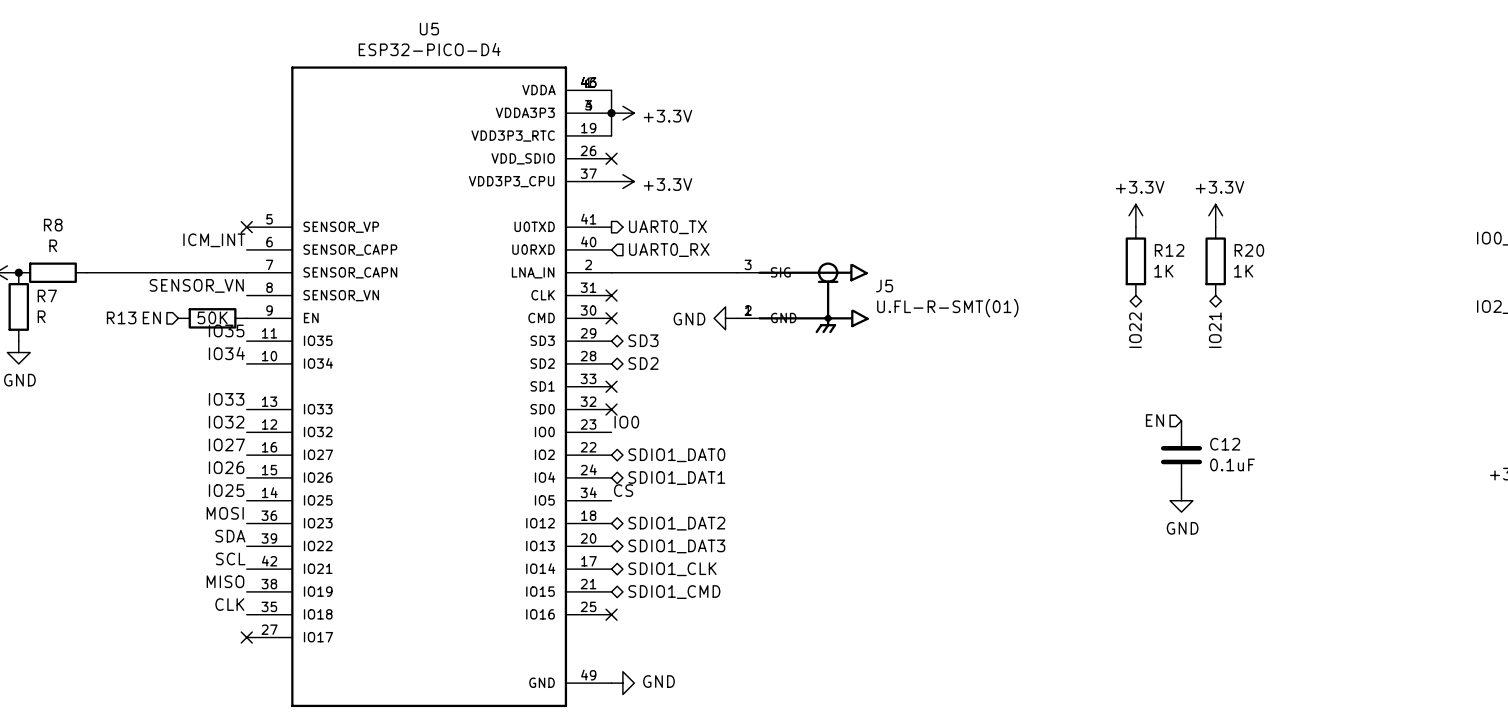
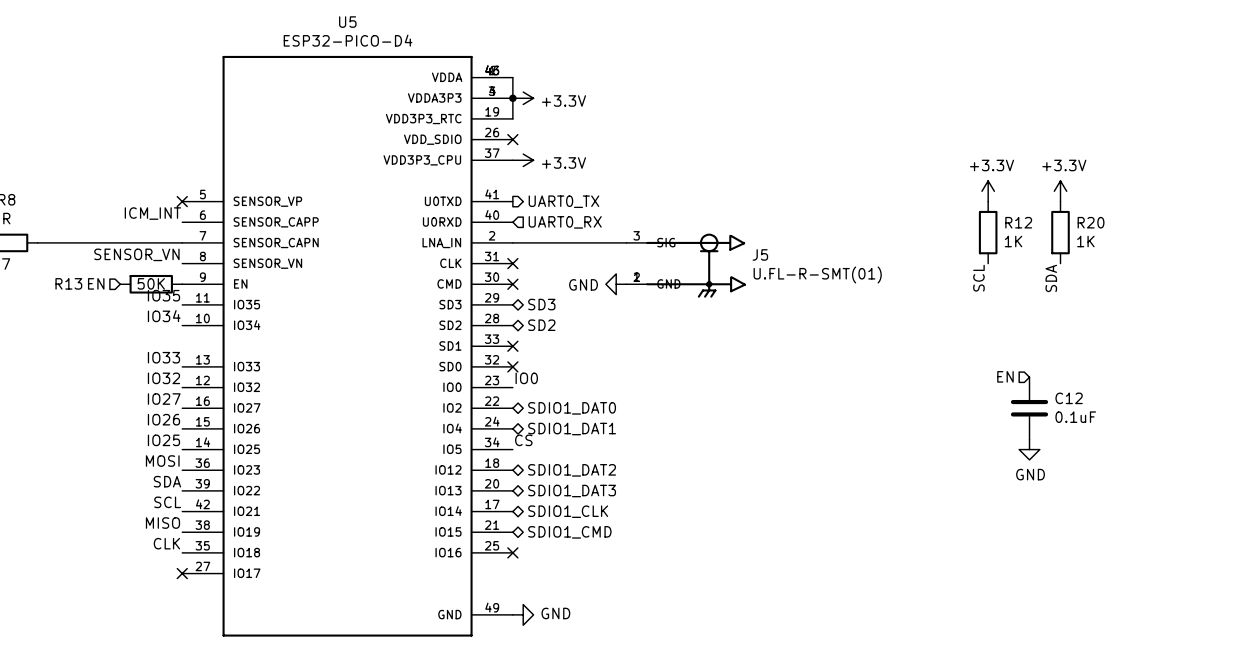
label: none -> SCL (978, 278)
label: none -> SDA (1051, 278)
hierarchical label: IO22 (1135, 330) -> none
hierarchical label: IO21 (1215, 330) -> none

